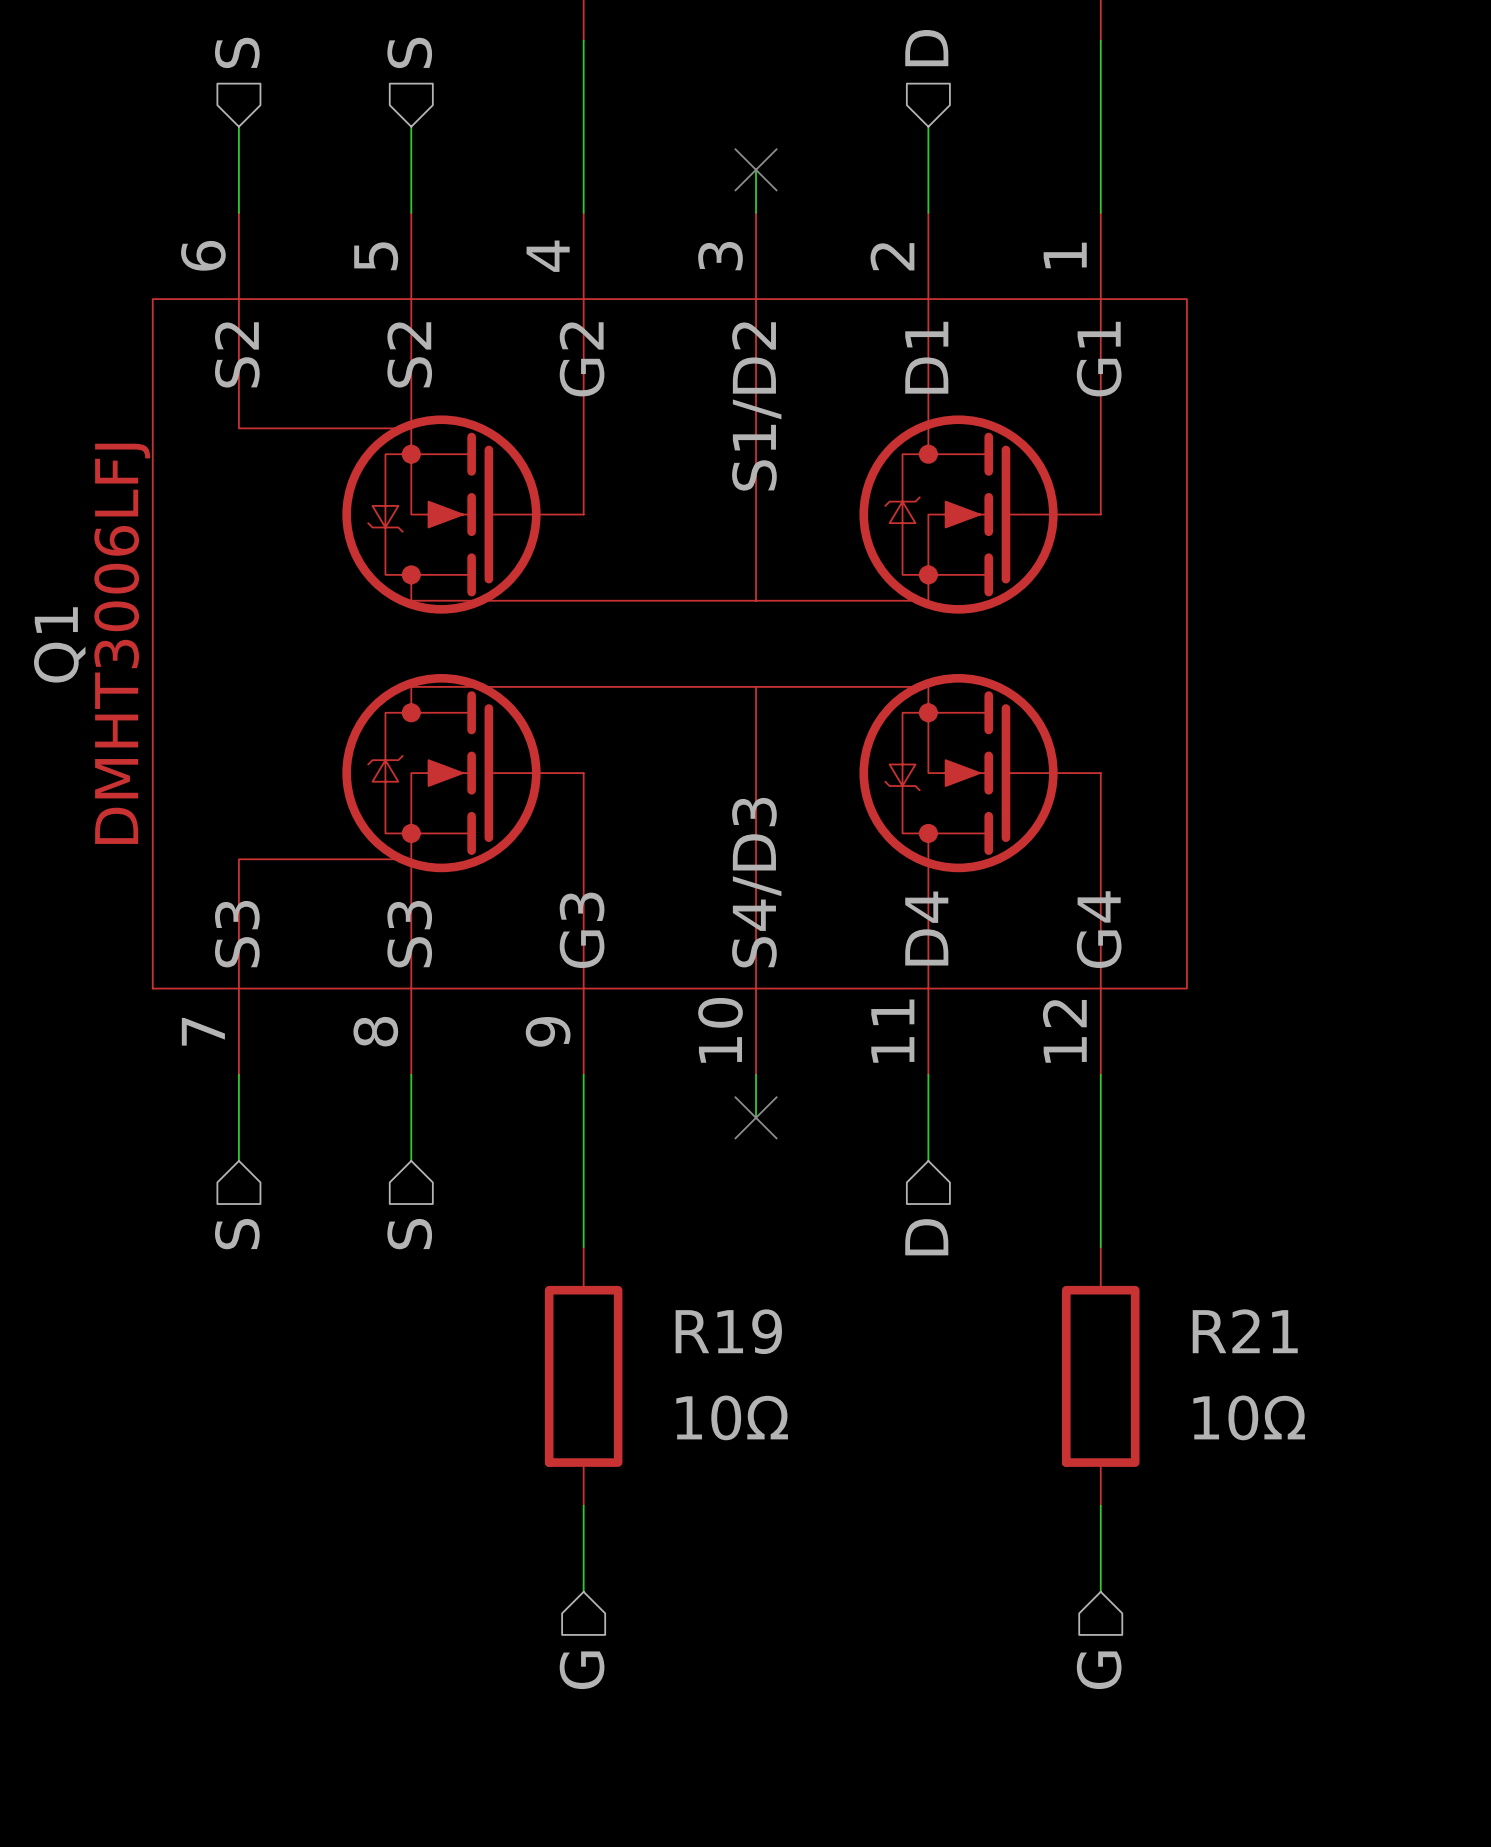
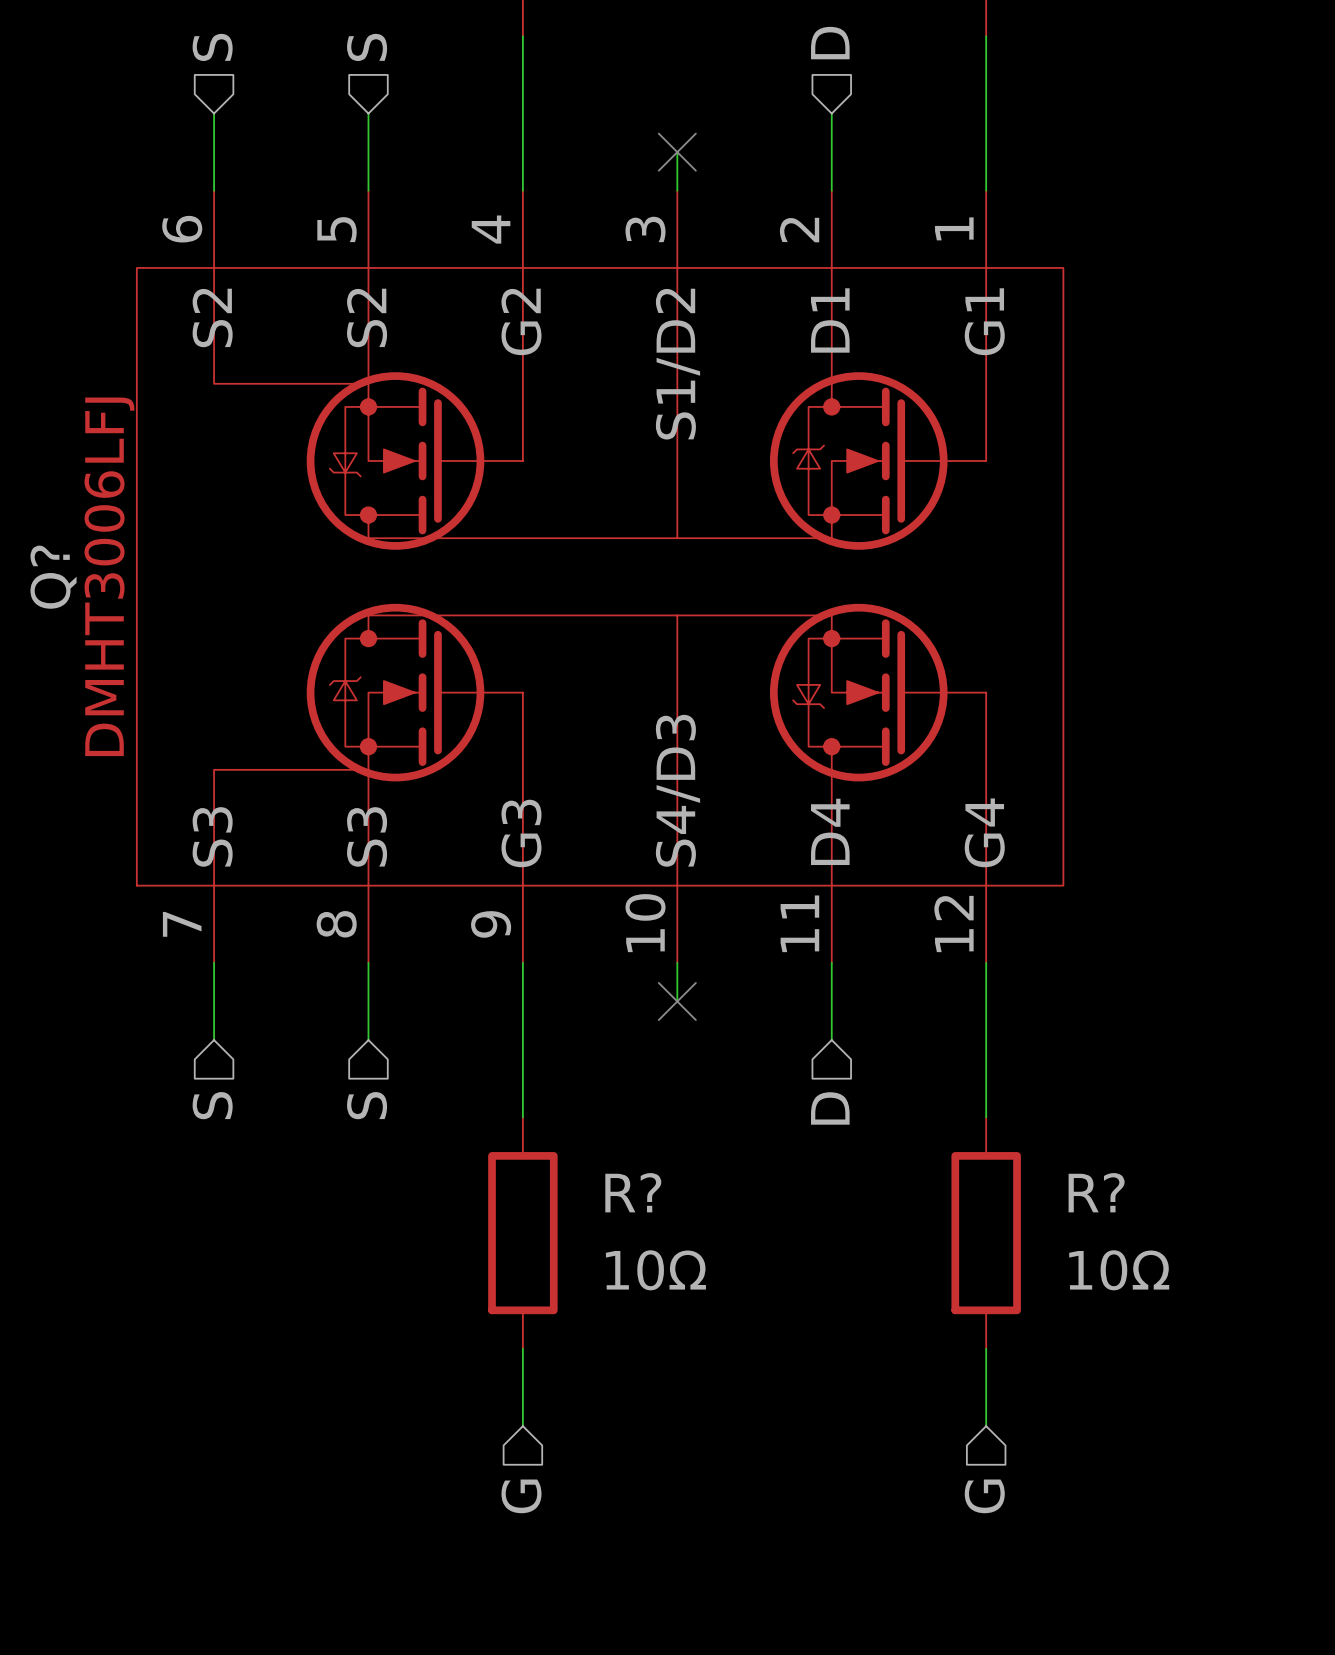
Q1 name: Q1 (59, 644) -> Q? (53, 577)
R19 name: R19 (728, 1331) -> R? (633, 1192)
R21 name: R21 (1245, 1331) -> R? (1096, 1192)

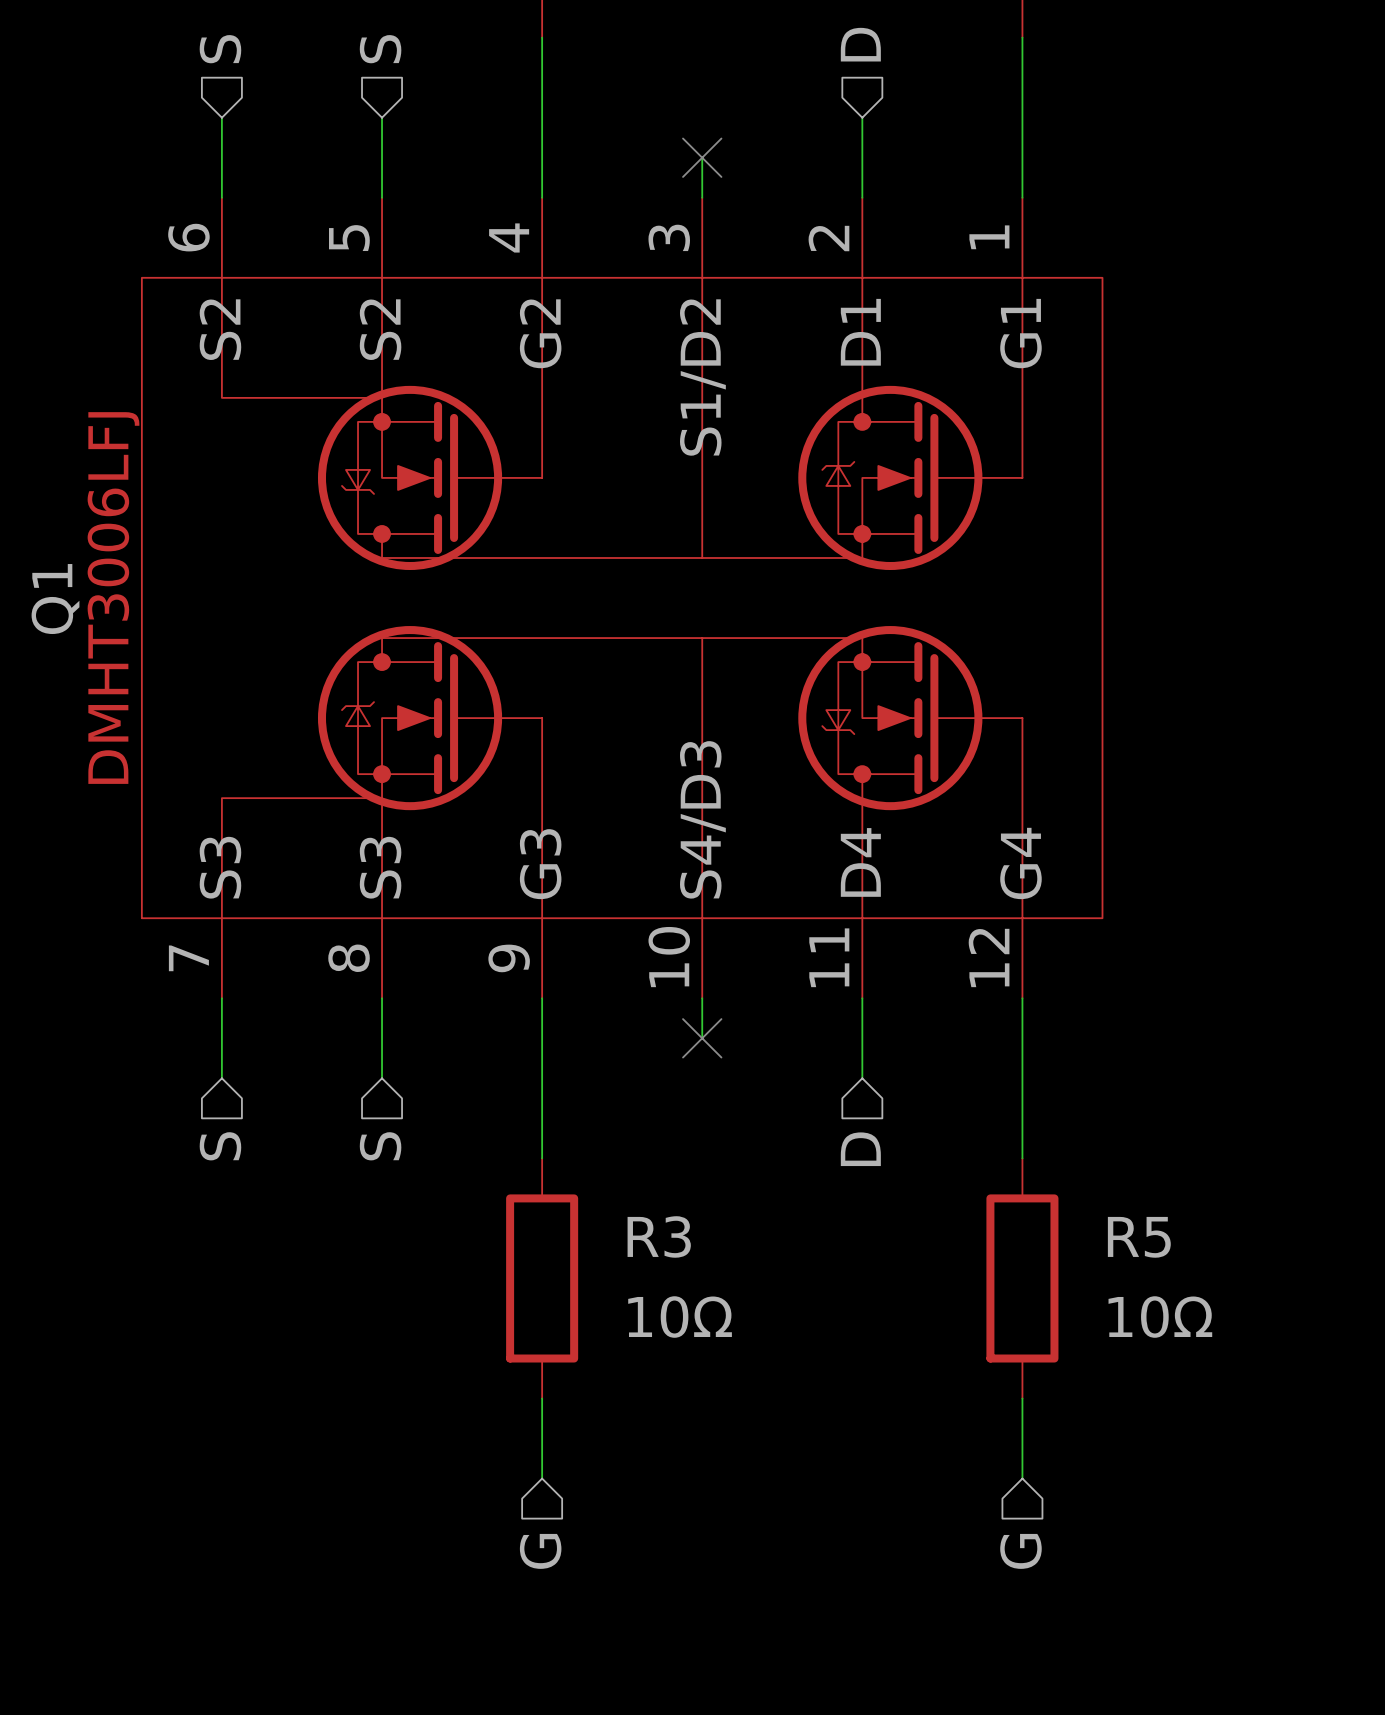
Q? name: Q? (53, 577) -> Q1 (55, 599)
R? name: R? (633, 1192) -> R3 (659, 1236)
R? name: R? (1096, 1192) -> R5 (1139, 1237)

